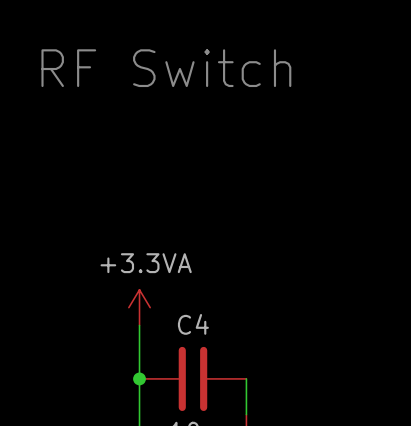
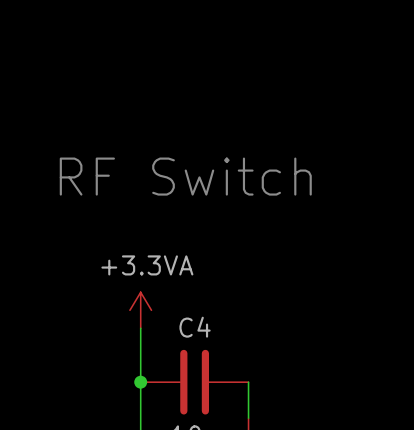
text position: RF Switch (166, 68) -> RF Switch (185, 176)

